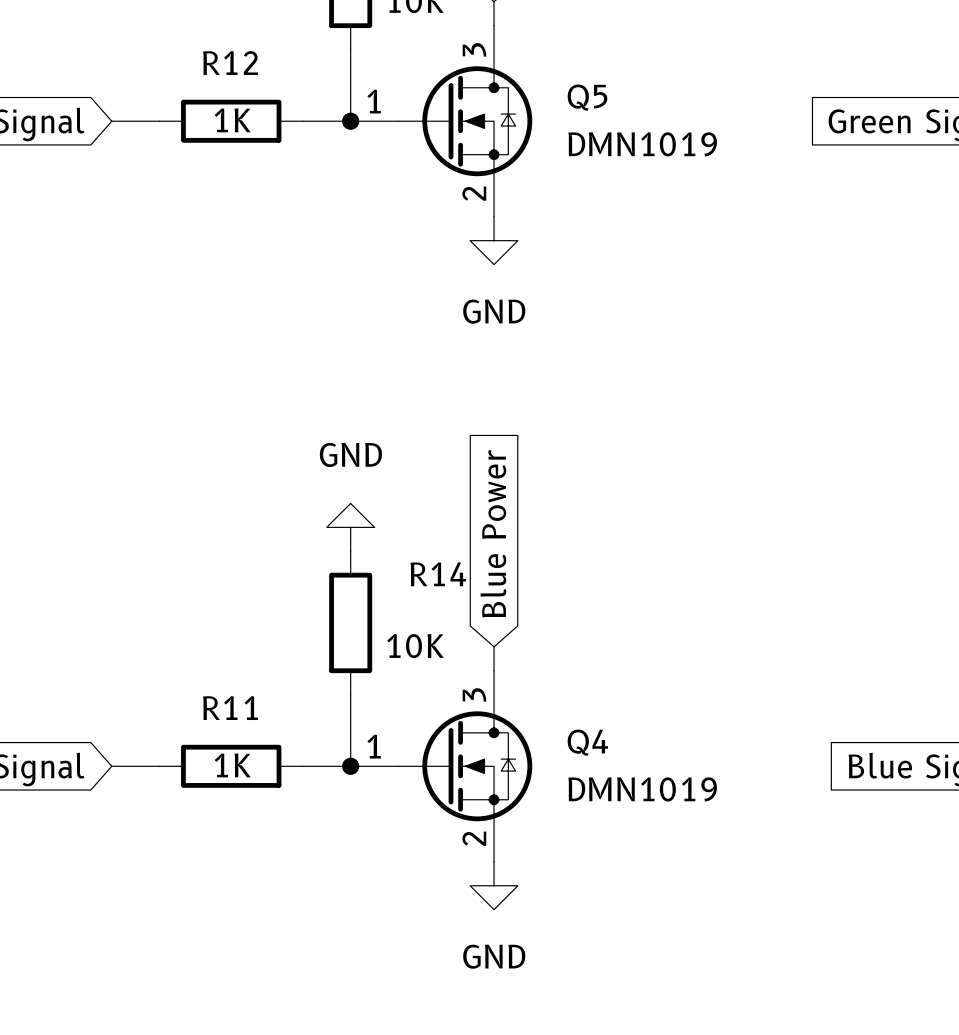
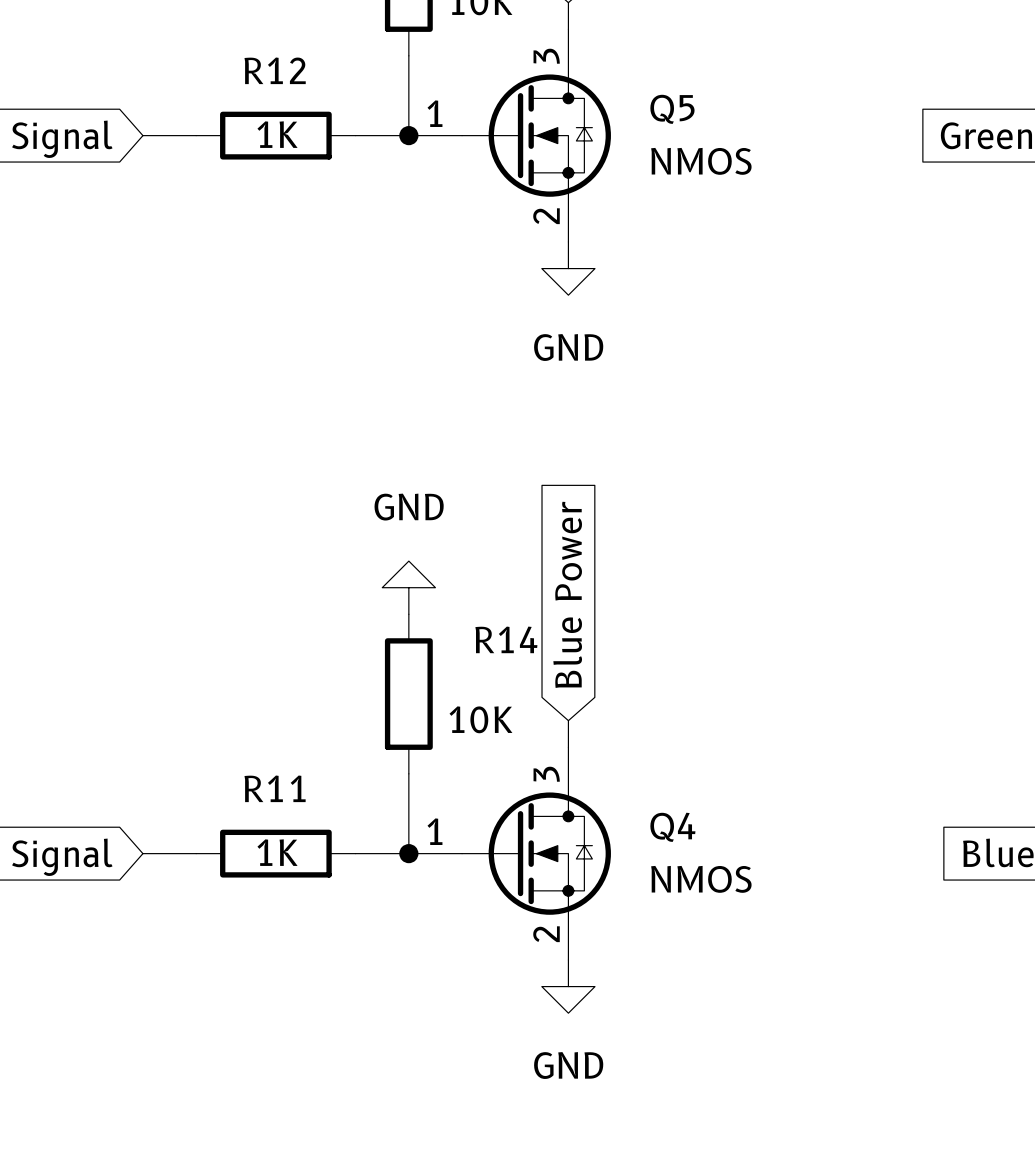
Q5 value: DMN1019 (642, 144) -> NMOS (701, 161)
Q4 value: DMN1019 (642, 789) -> NMOS (701, 879)

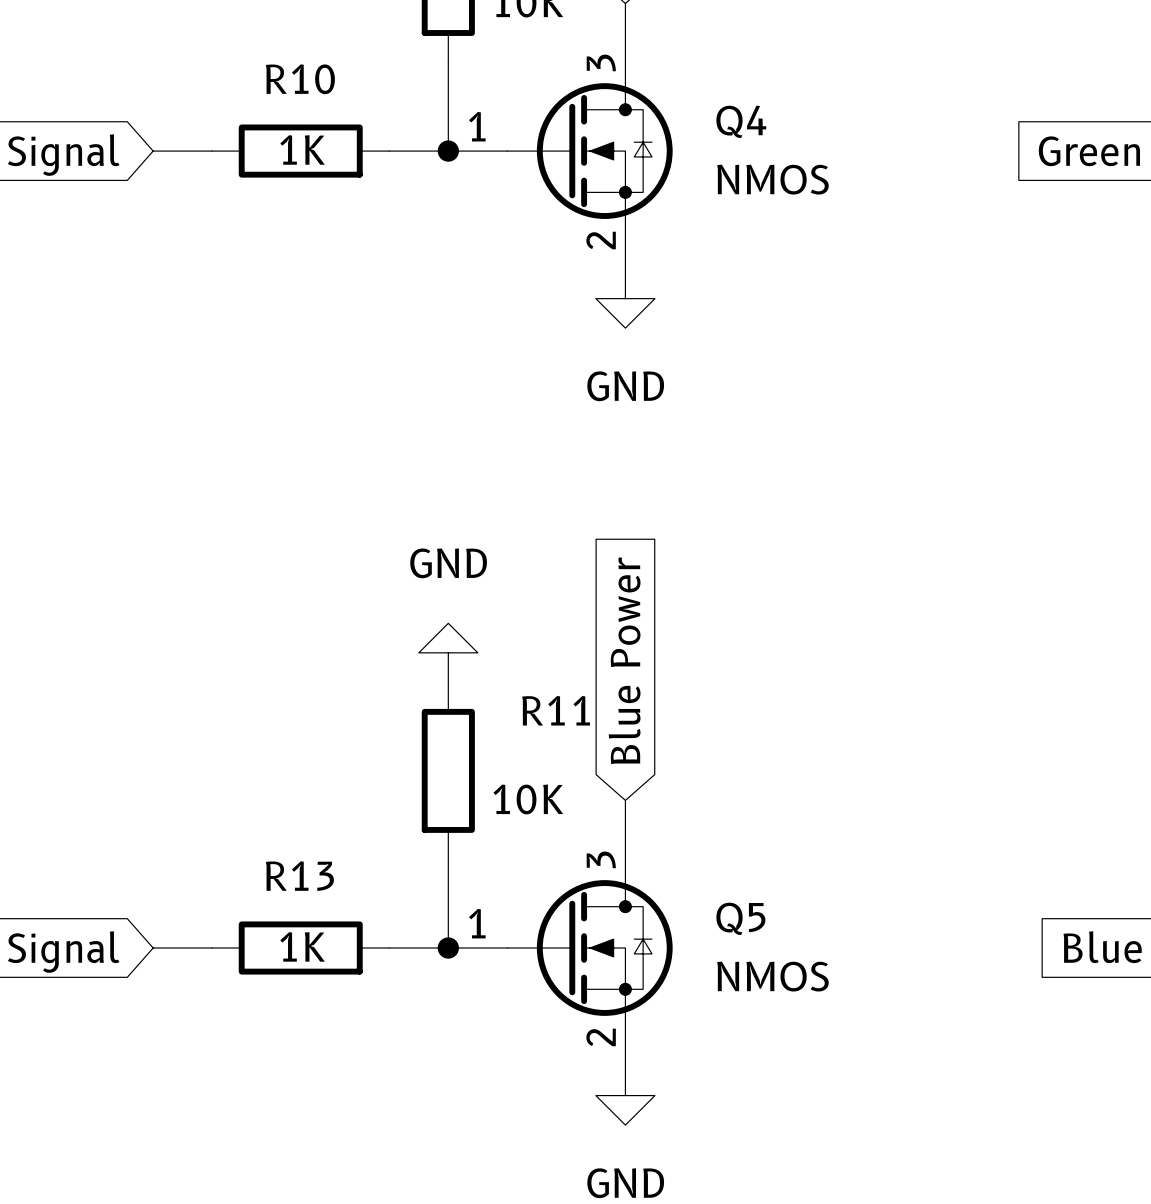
R12 name: R12 (275, 70) -> R10 (300, 79)
Q5 name: Q5 (672, 109) -> Q4 (741, 121)
R14 name: R14 (506, 639) -> R11 (556, 710)
R11 name: R11 (275, 788) -> R13 (299, 876)
Q4 name: Q4 (672, 827) -> Q5 (740, 918)

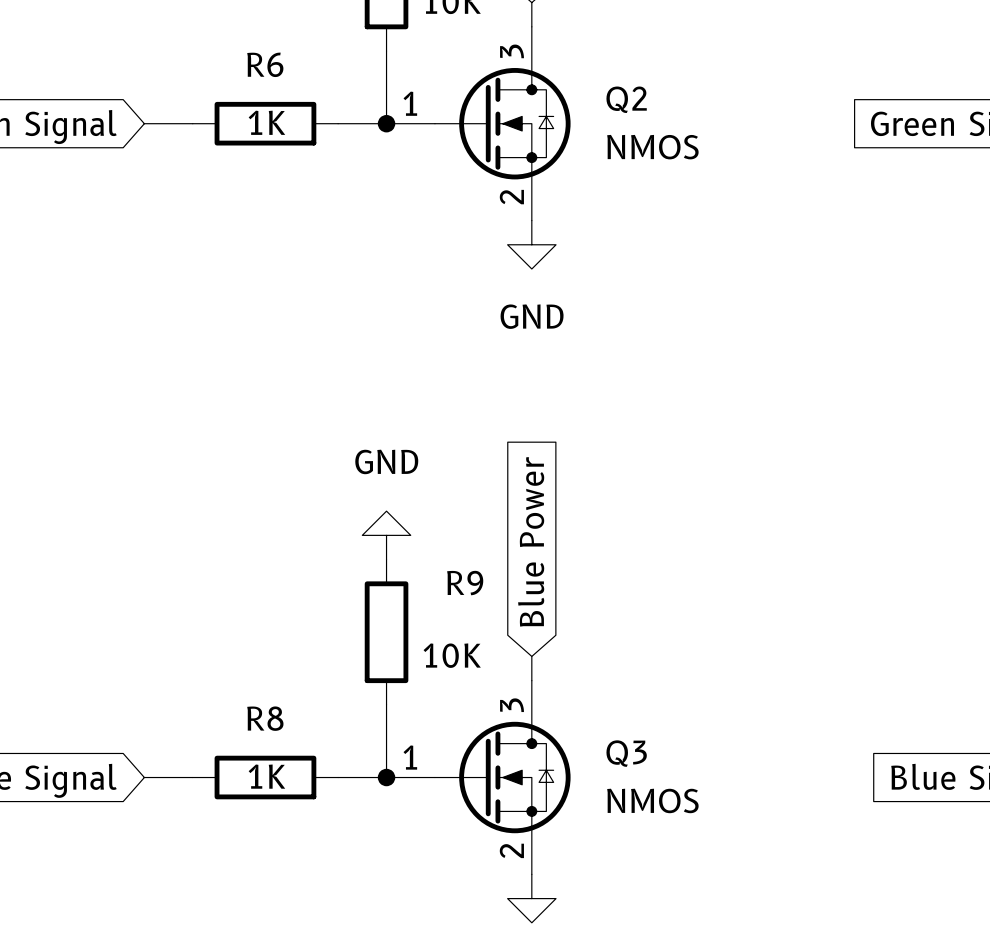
R10 name: R10 (300, 79) -> R6 (265, 64)
Q4 name: Q4 (741, 121) -> Q2 (626, 99)
R11 name: R11 (556, 710) -> R9 (465, 583)
R13 name: R13 (299, 876) -> R8 (265, 718)
Q5 name: Q5 (740, 918) -> Q3 (626, 753)

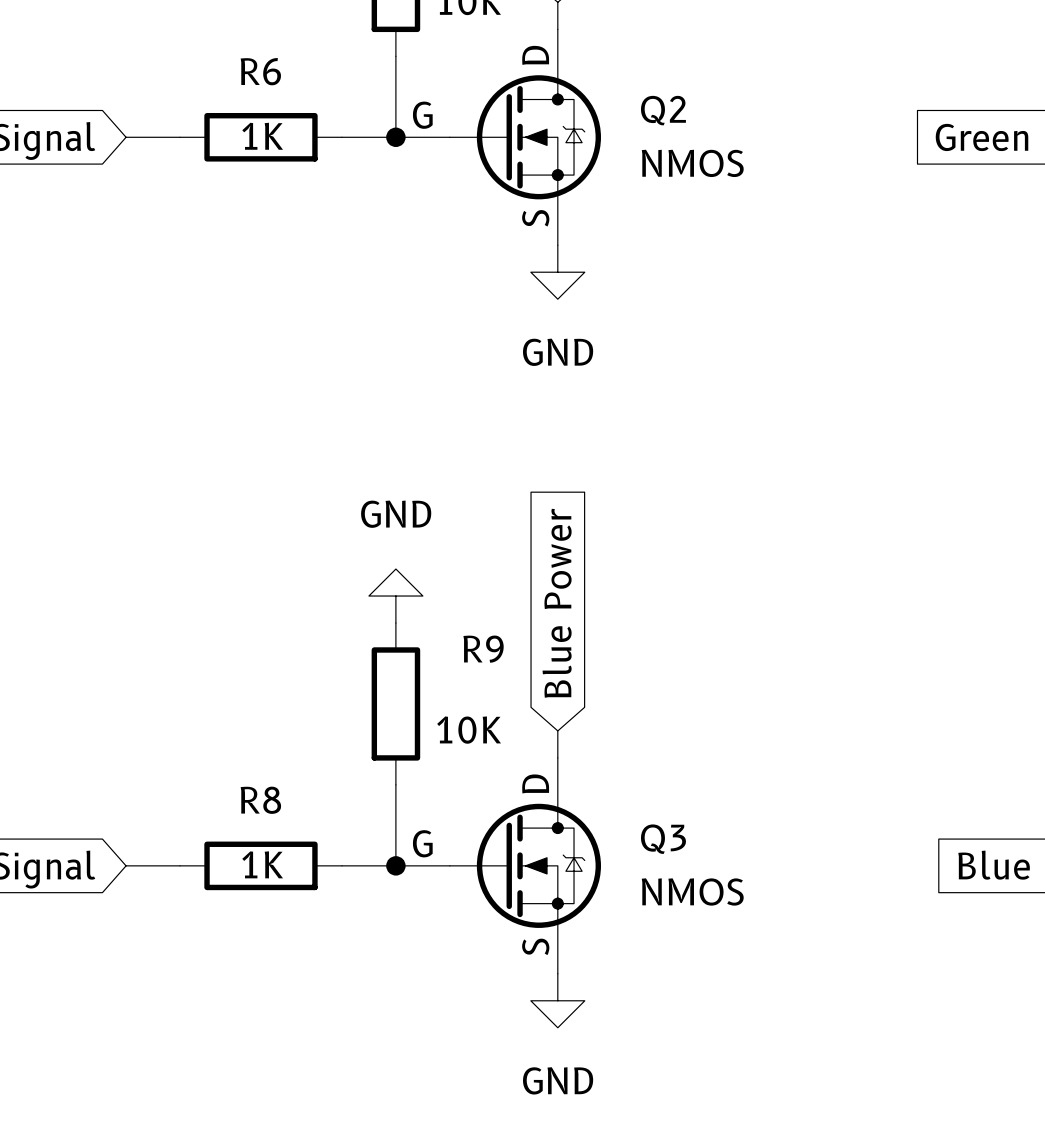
Q2 symbol: [386, 26, 571, 221] -> [395, 29, 601, 246]
Q3 symbol: [386, 680, 571, 875] -> [395, 757, 601, 974]

